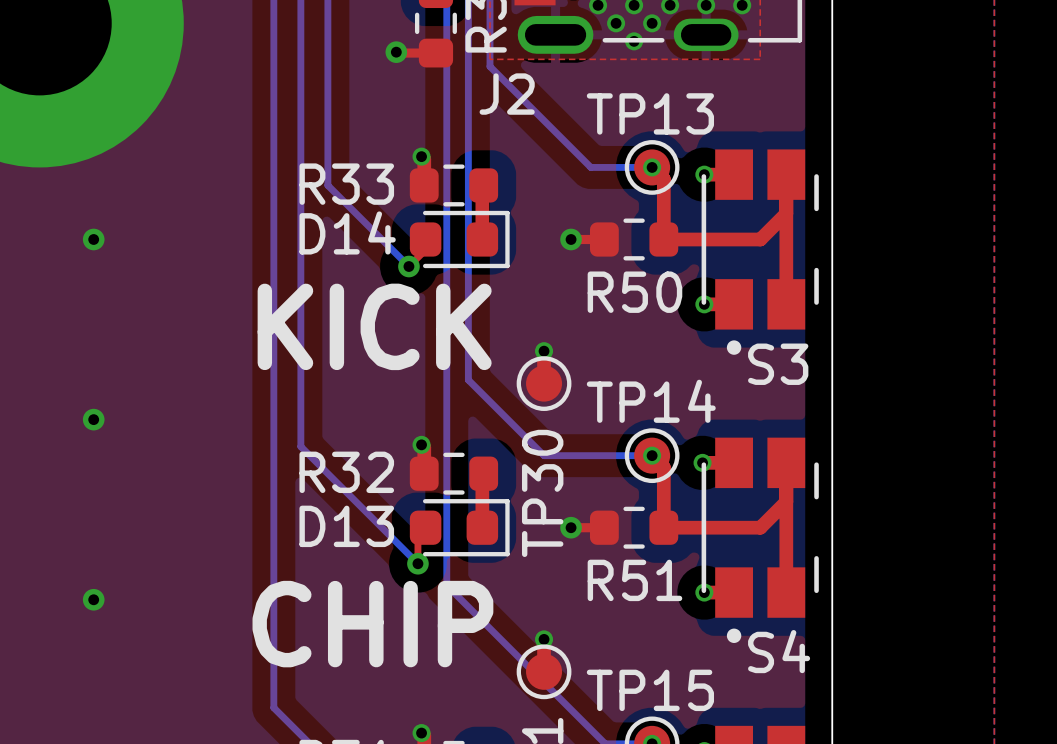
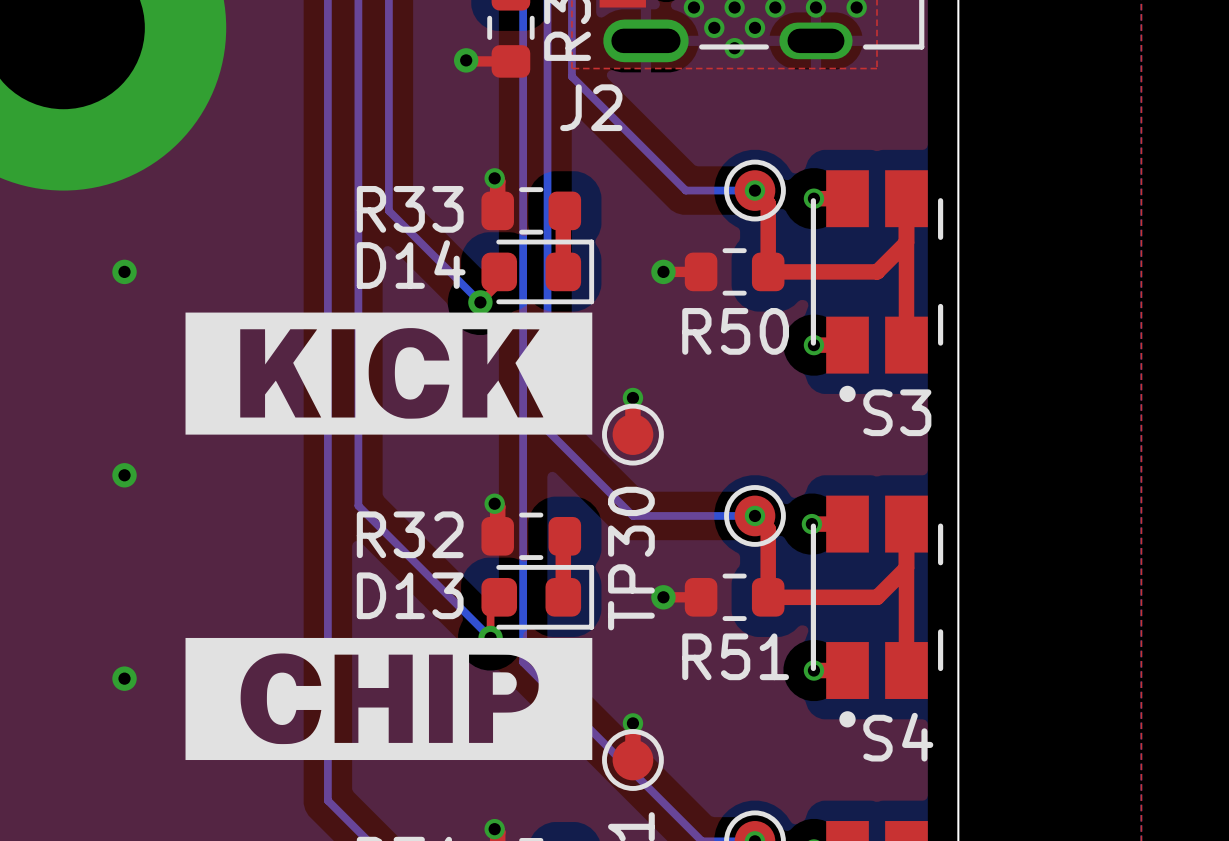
TP13 name: TP13 (650, 113) -> none
drawing: none -> [185, 312, 593, 435]
text: KICK (374, 326) -> none
TP14 name: TP14 (651, 401) -> none
drawing: none -> [185, 637, 593, 761]
text: CHIP (372, 624) -> none
TP15 name: TP15 (650, 690) -> none

